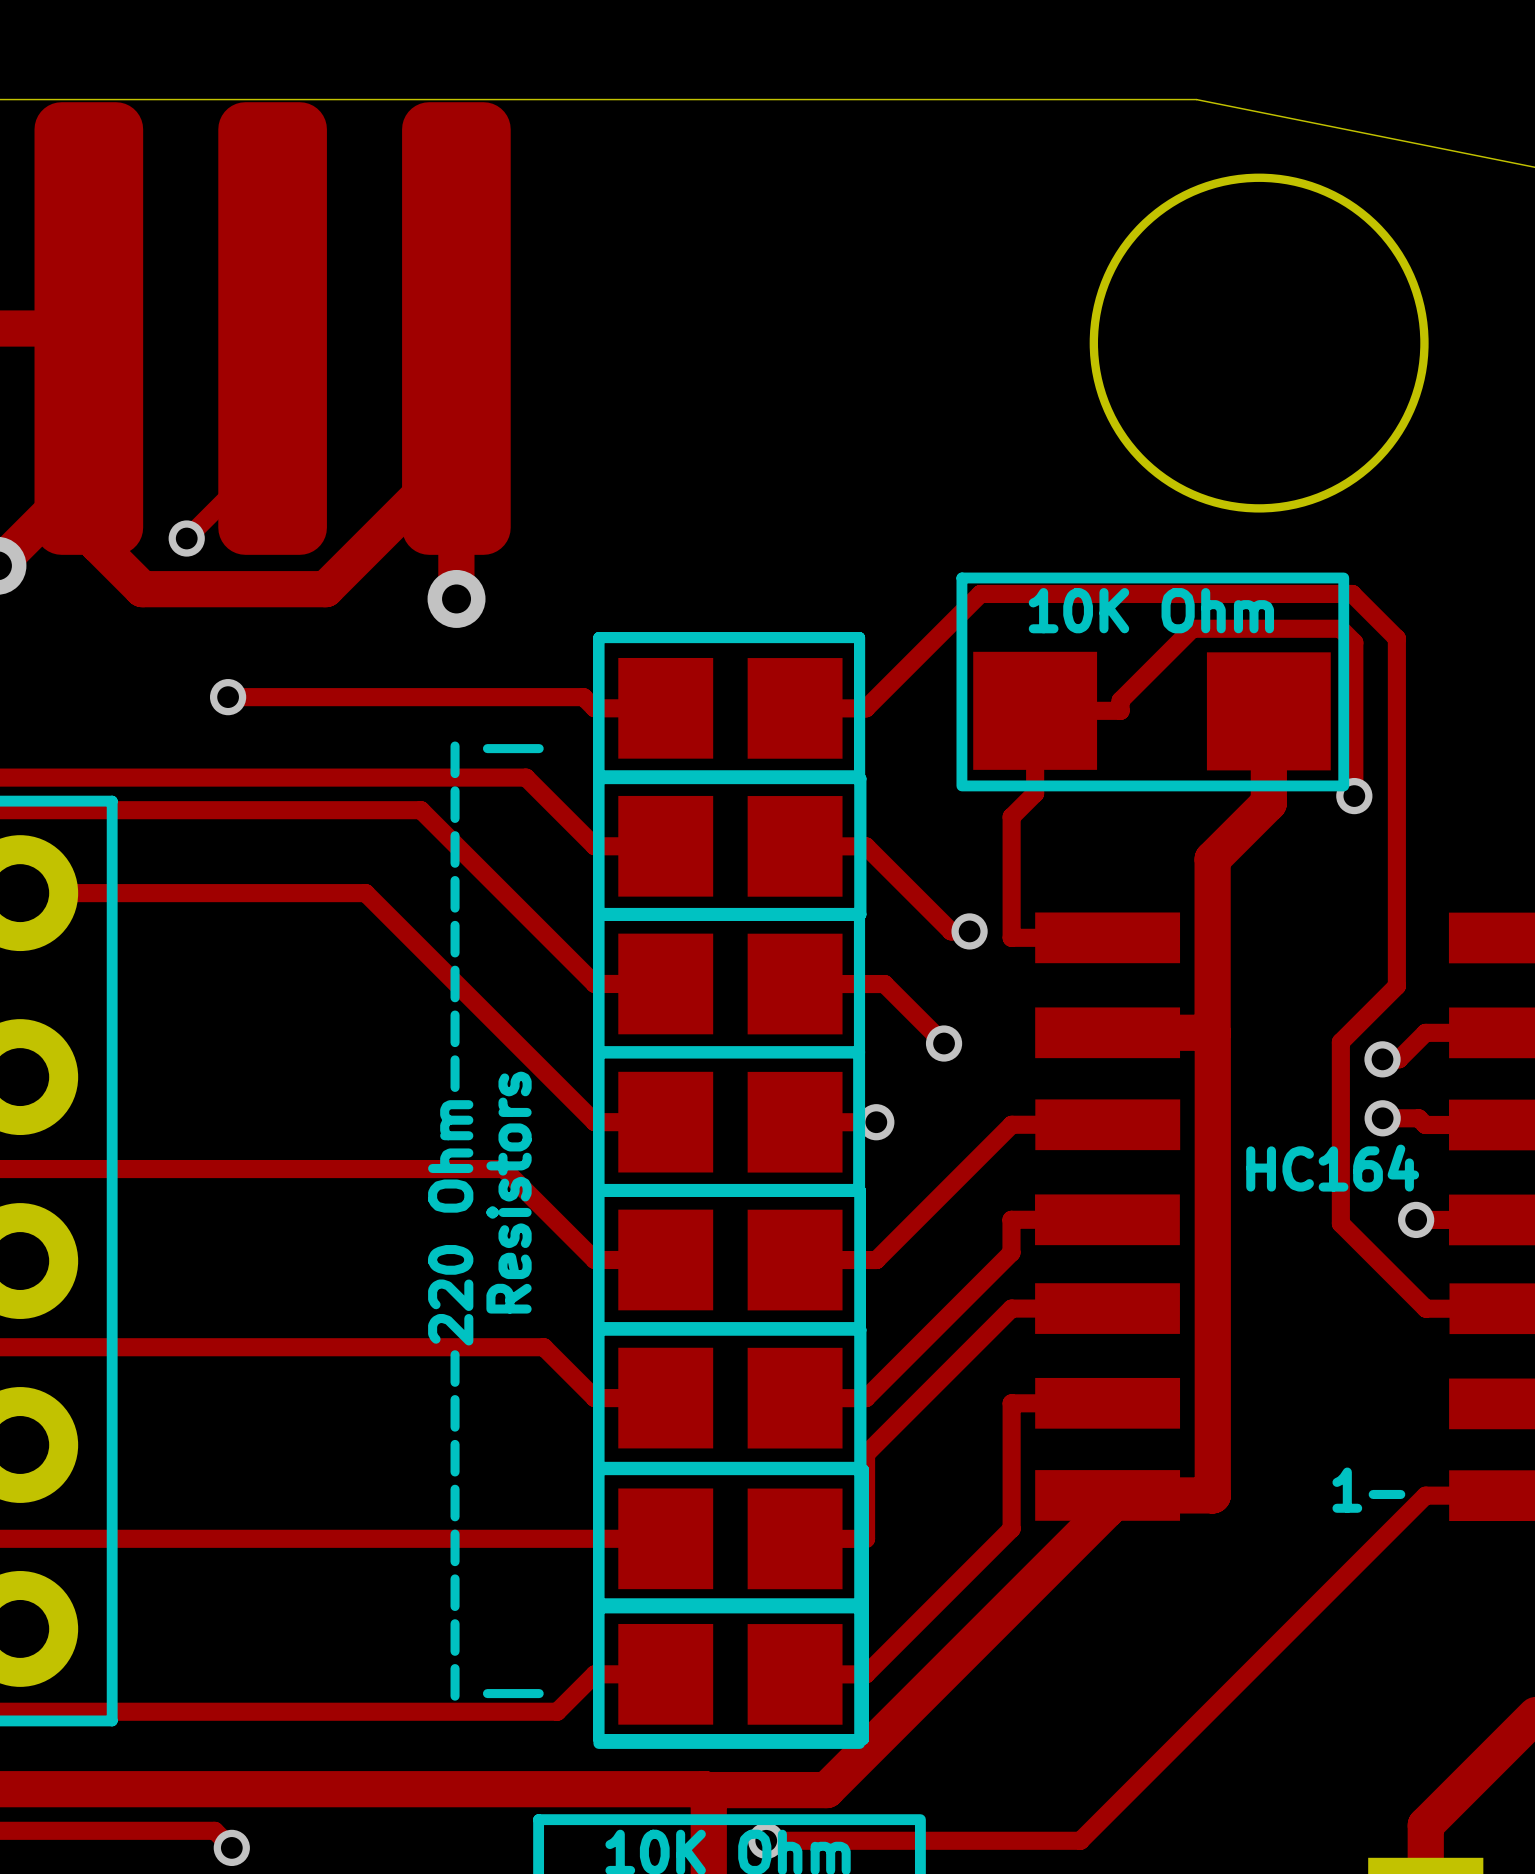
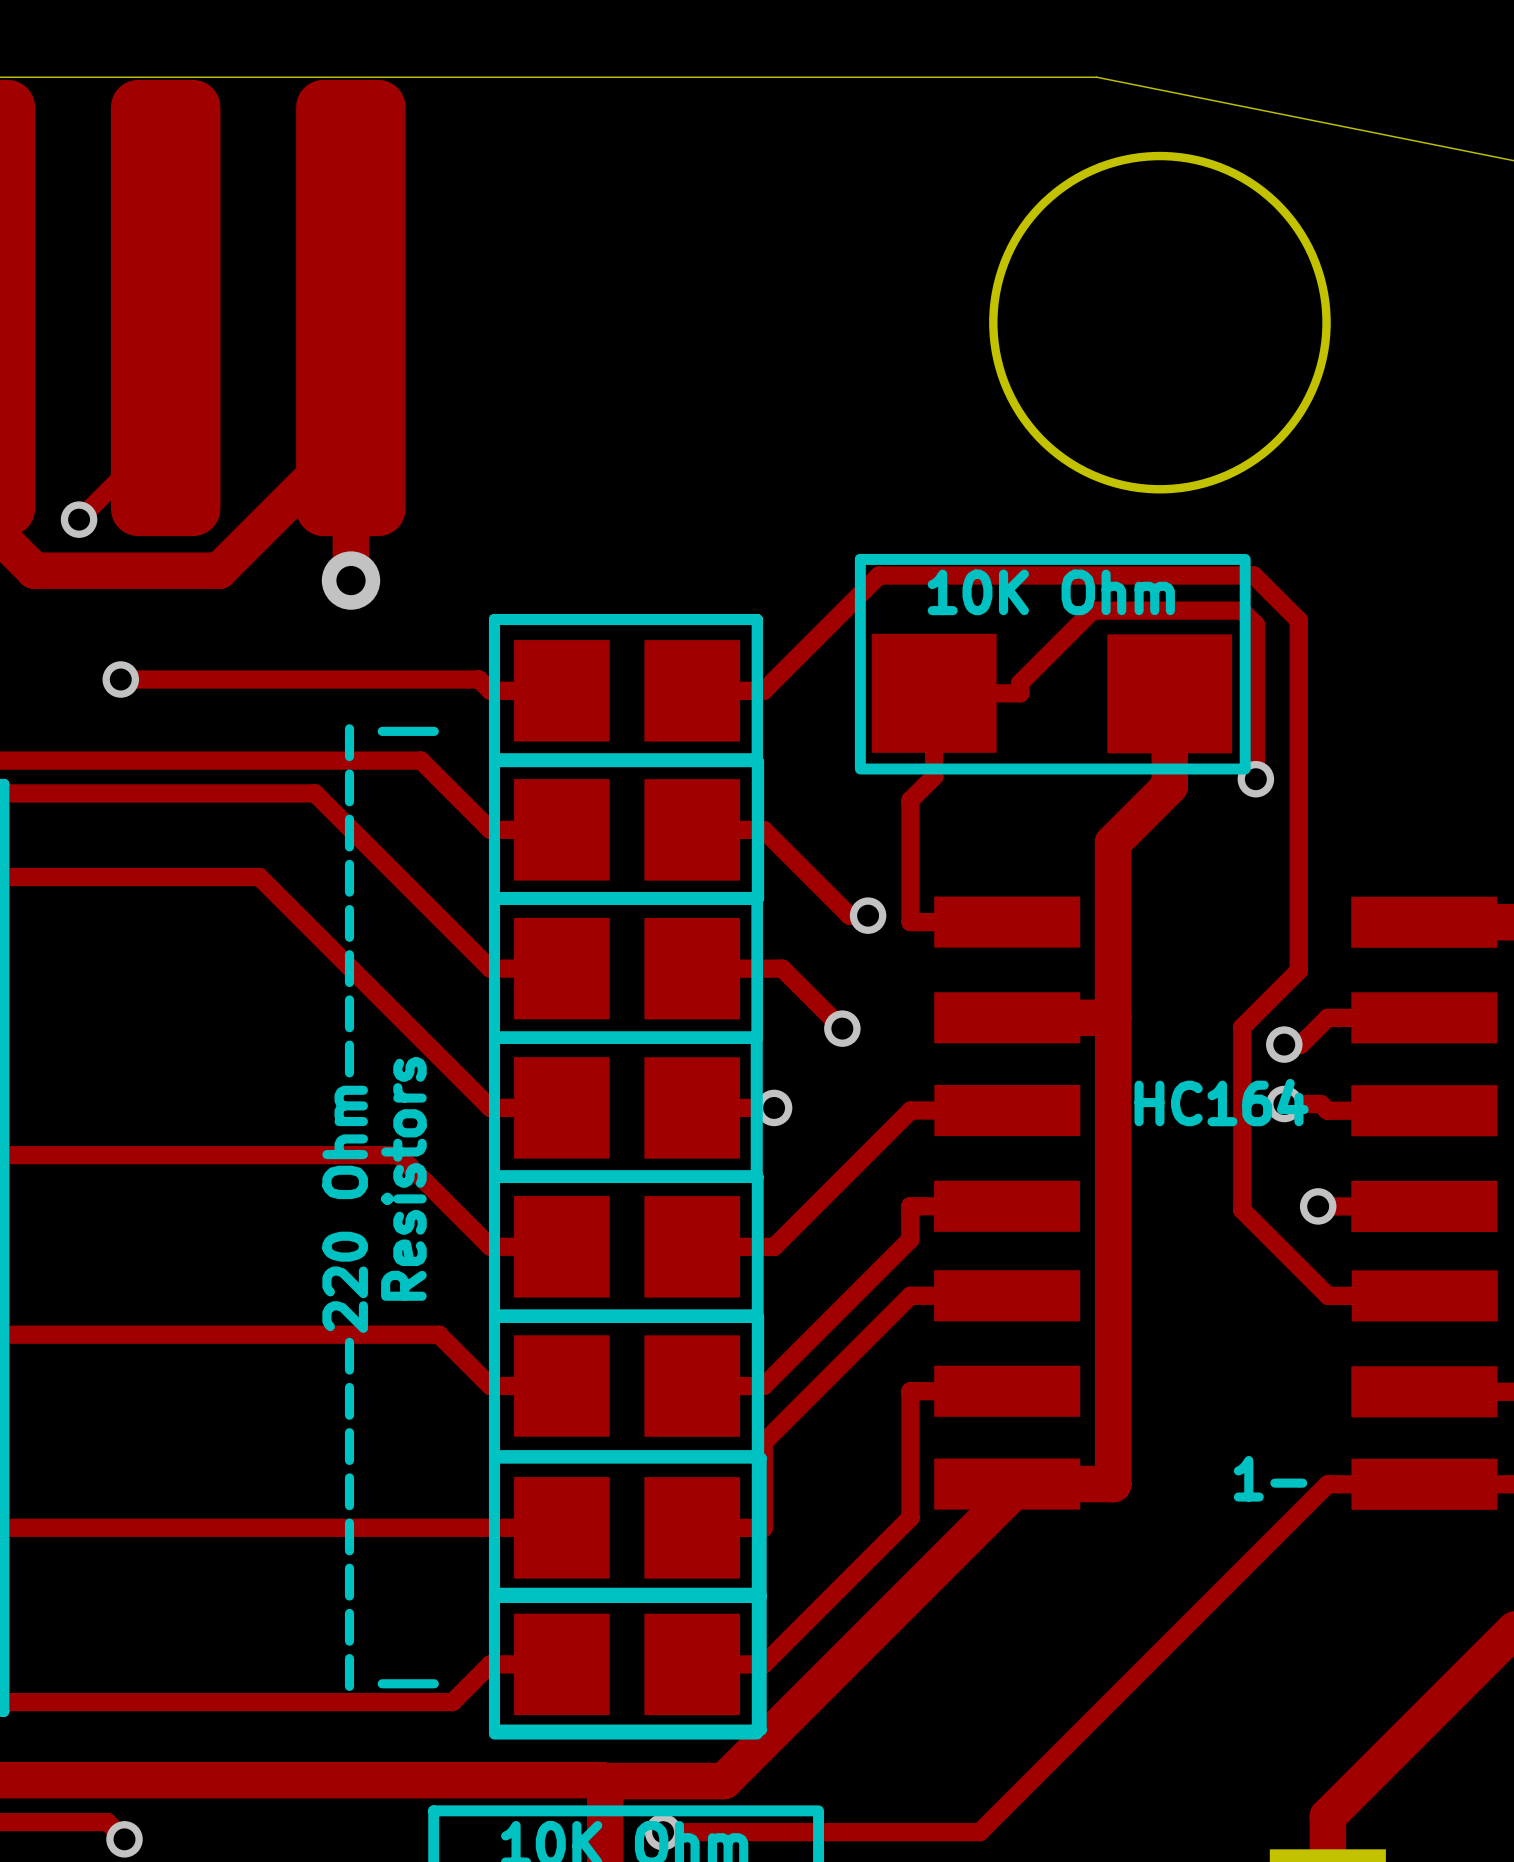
text position: HC164 (1332, 1168) -> HC164 (1221, 1102)

